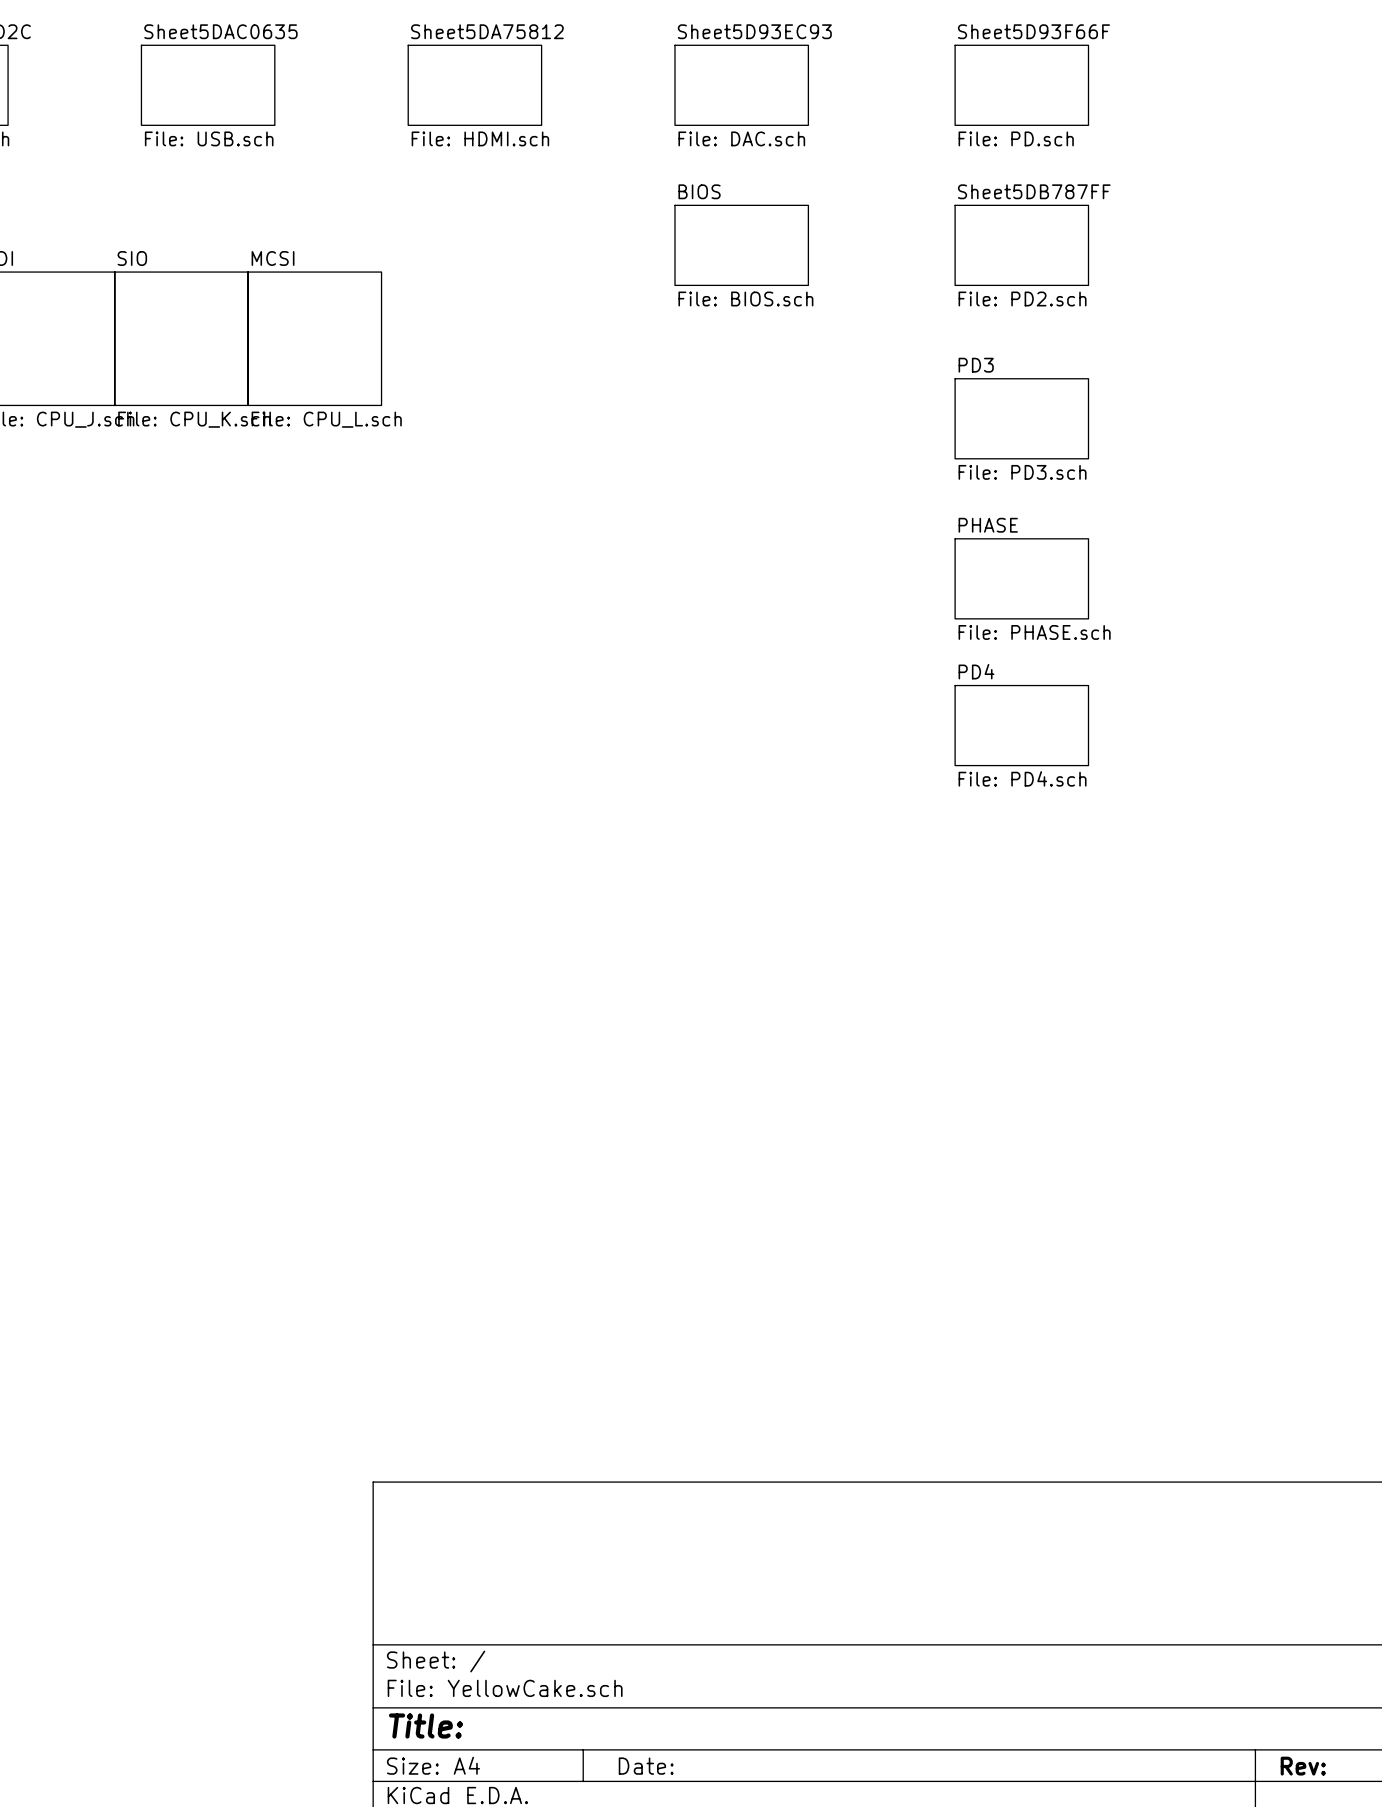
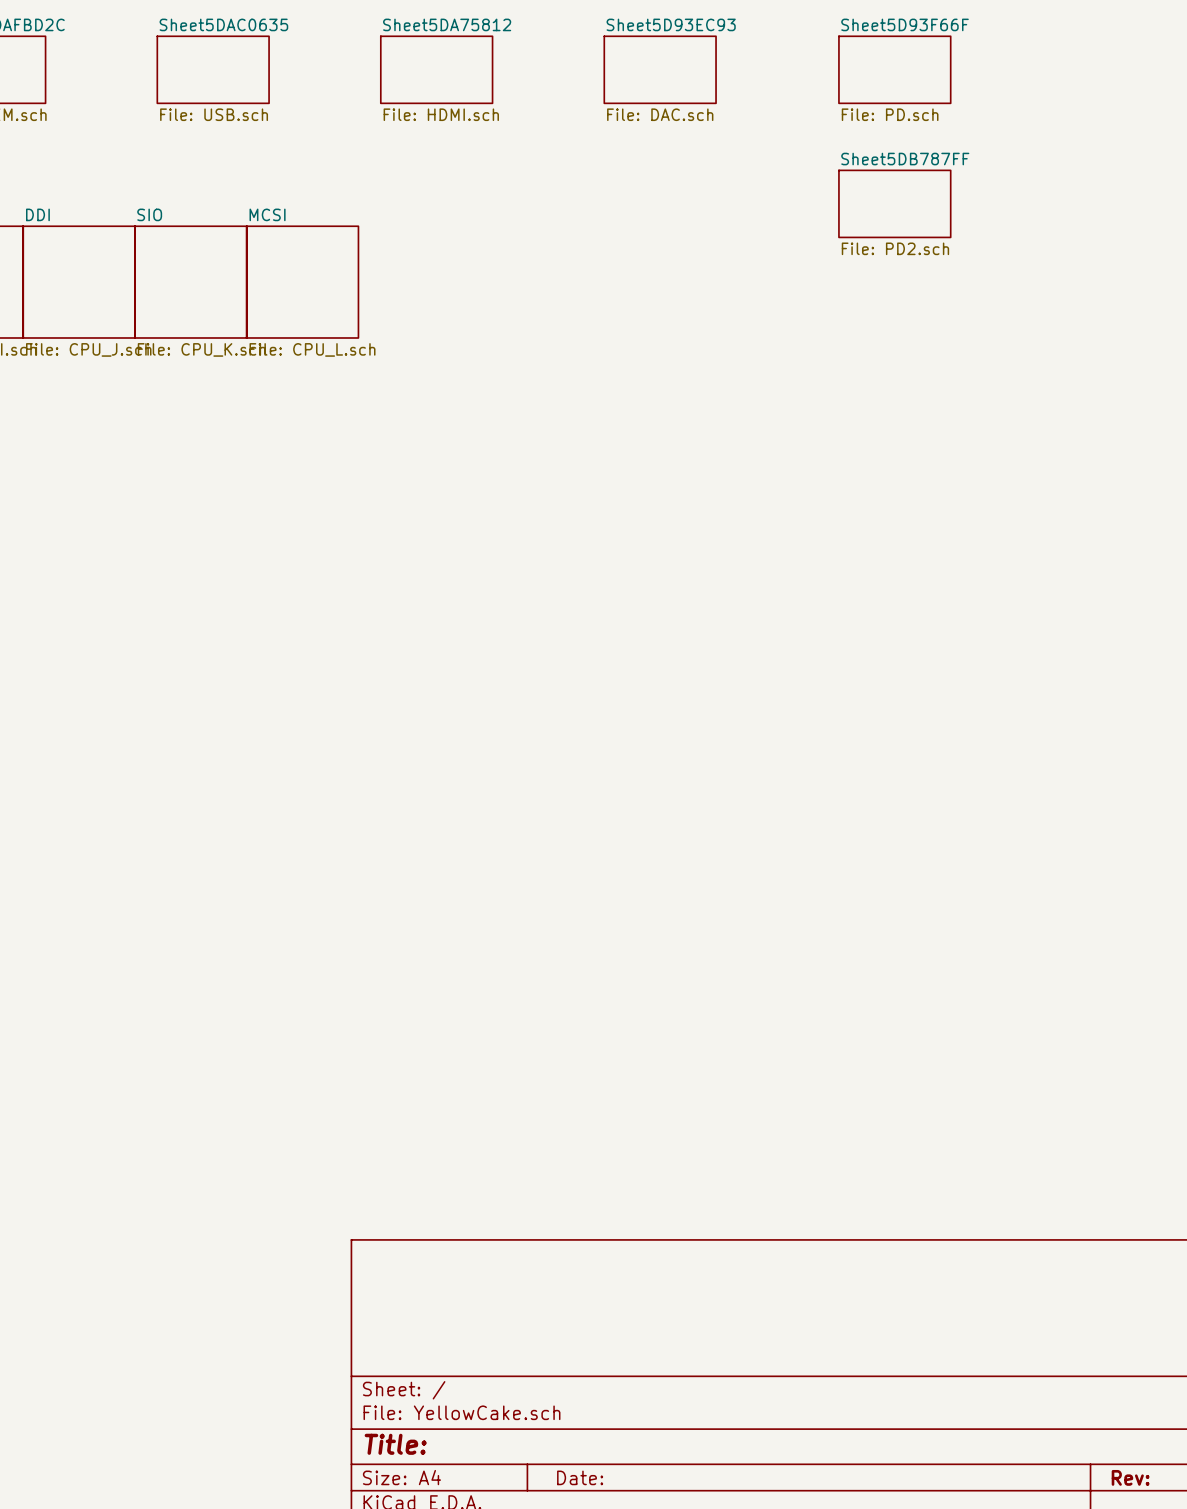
sheet BIOS: File: BIOS.sch (741, 245) -> none
sheet PD3: File: PD3.sch (1021, 418) -> none
sheet PHASE: File: PHASE.sch (1021, 578) -> none
sheet PD4: File: PD4.sch (1021, 725) -> none

